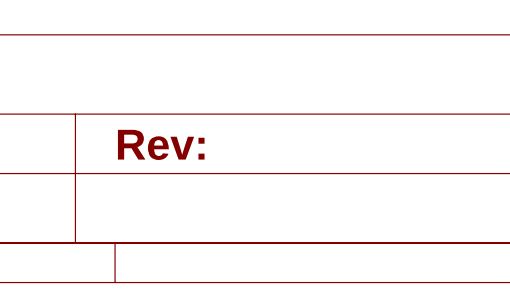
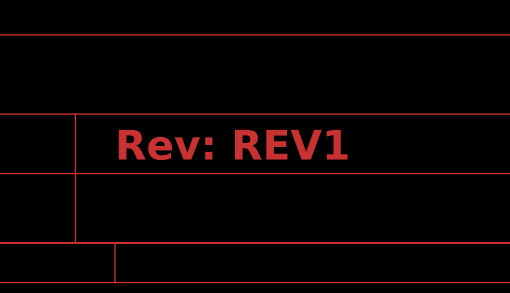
title block: Rev: (161, 144) -> Rev: REV1 (233, 144)

